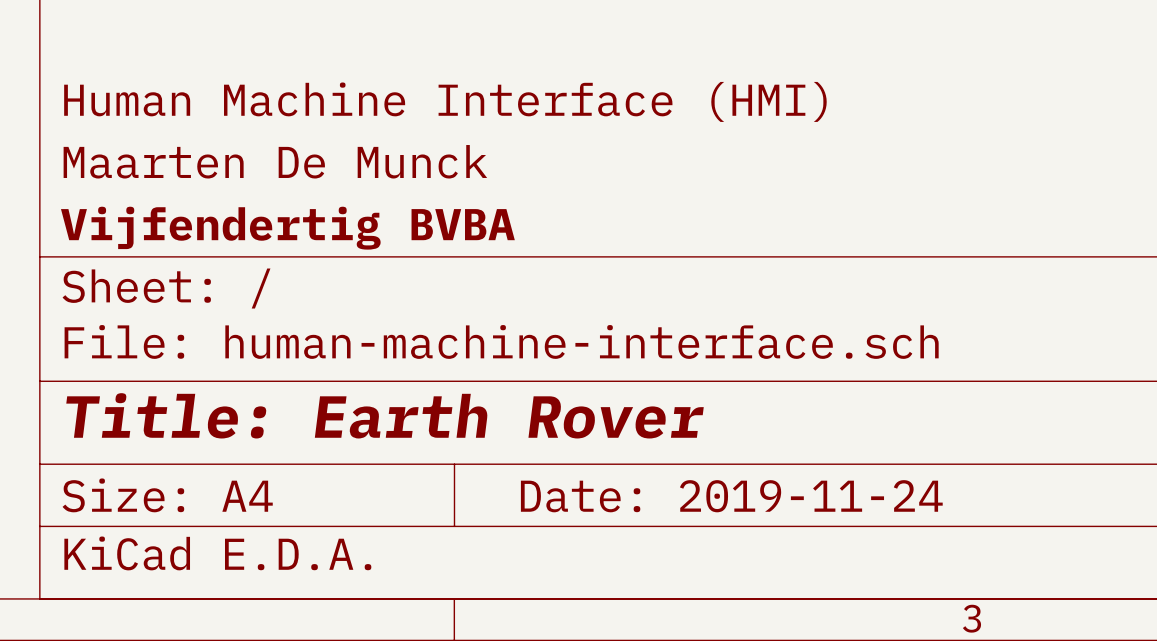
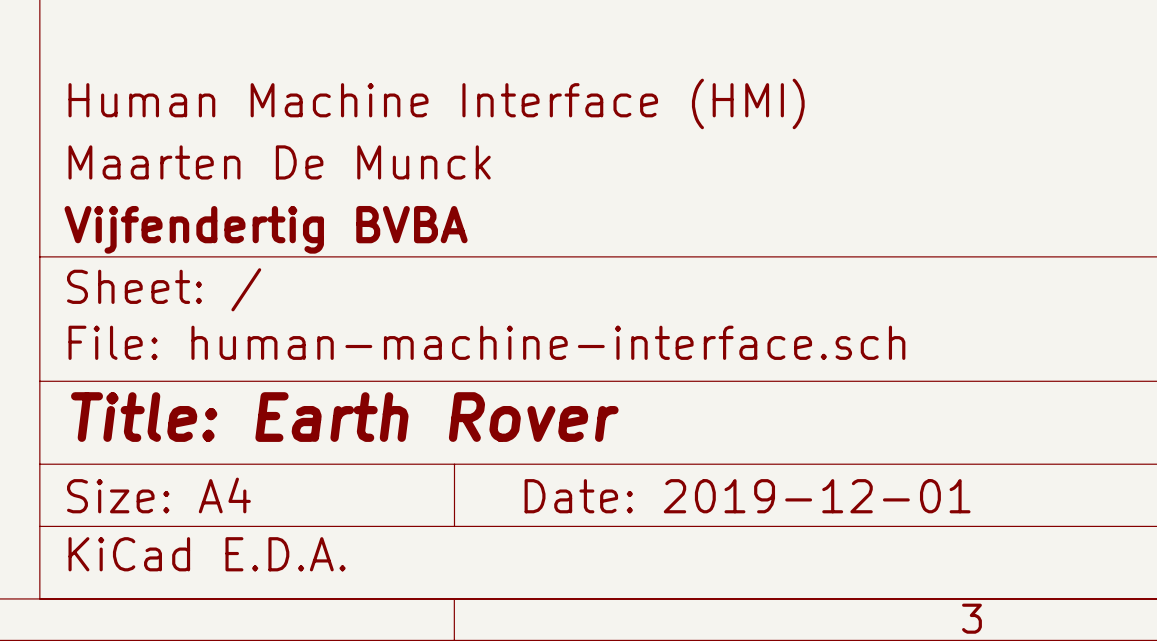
title block: Date: 2019-11-24 (731, 496) -> Date: 2019-12-01 (747, 496)

